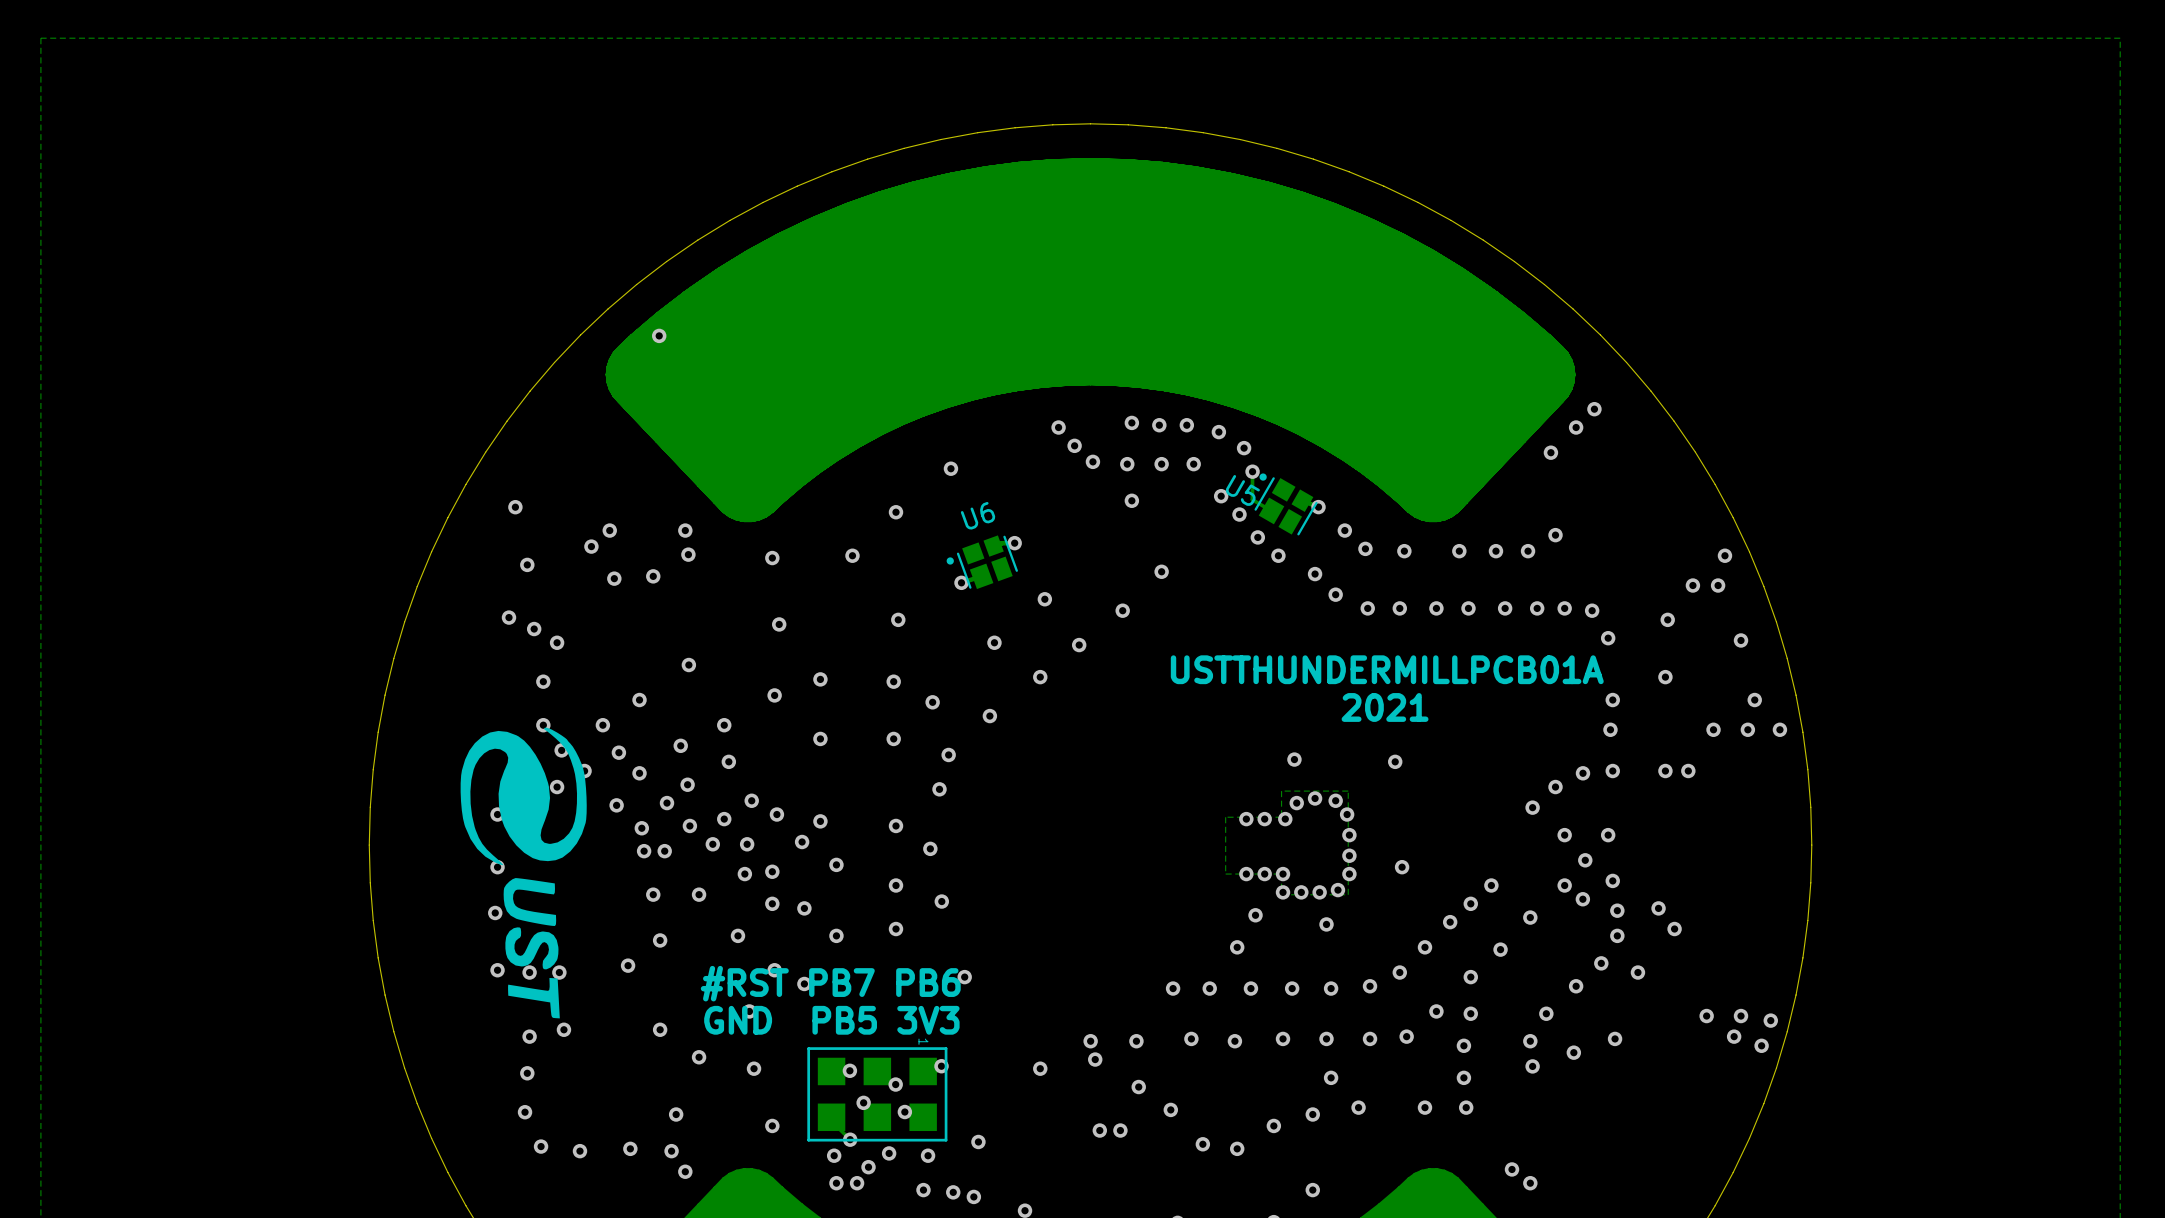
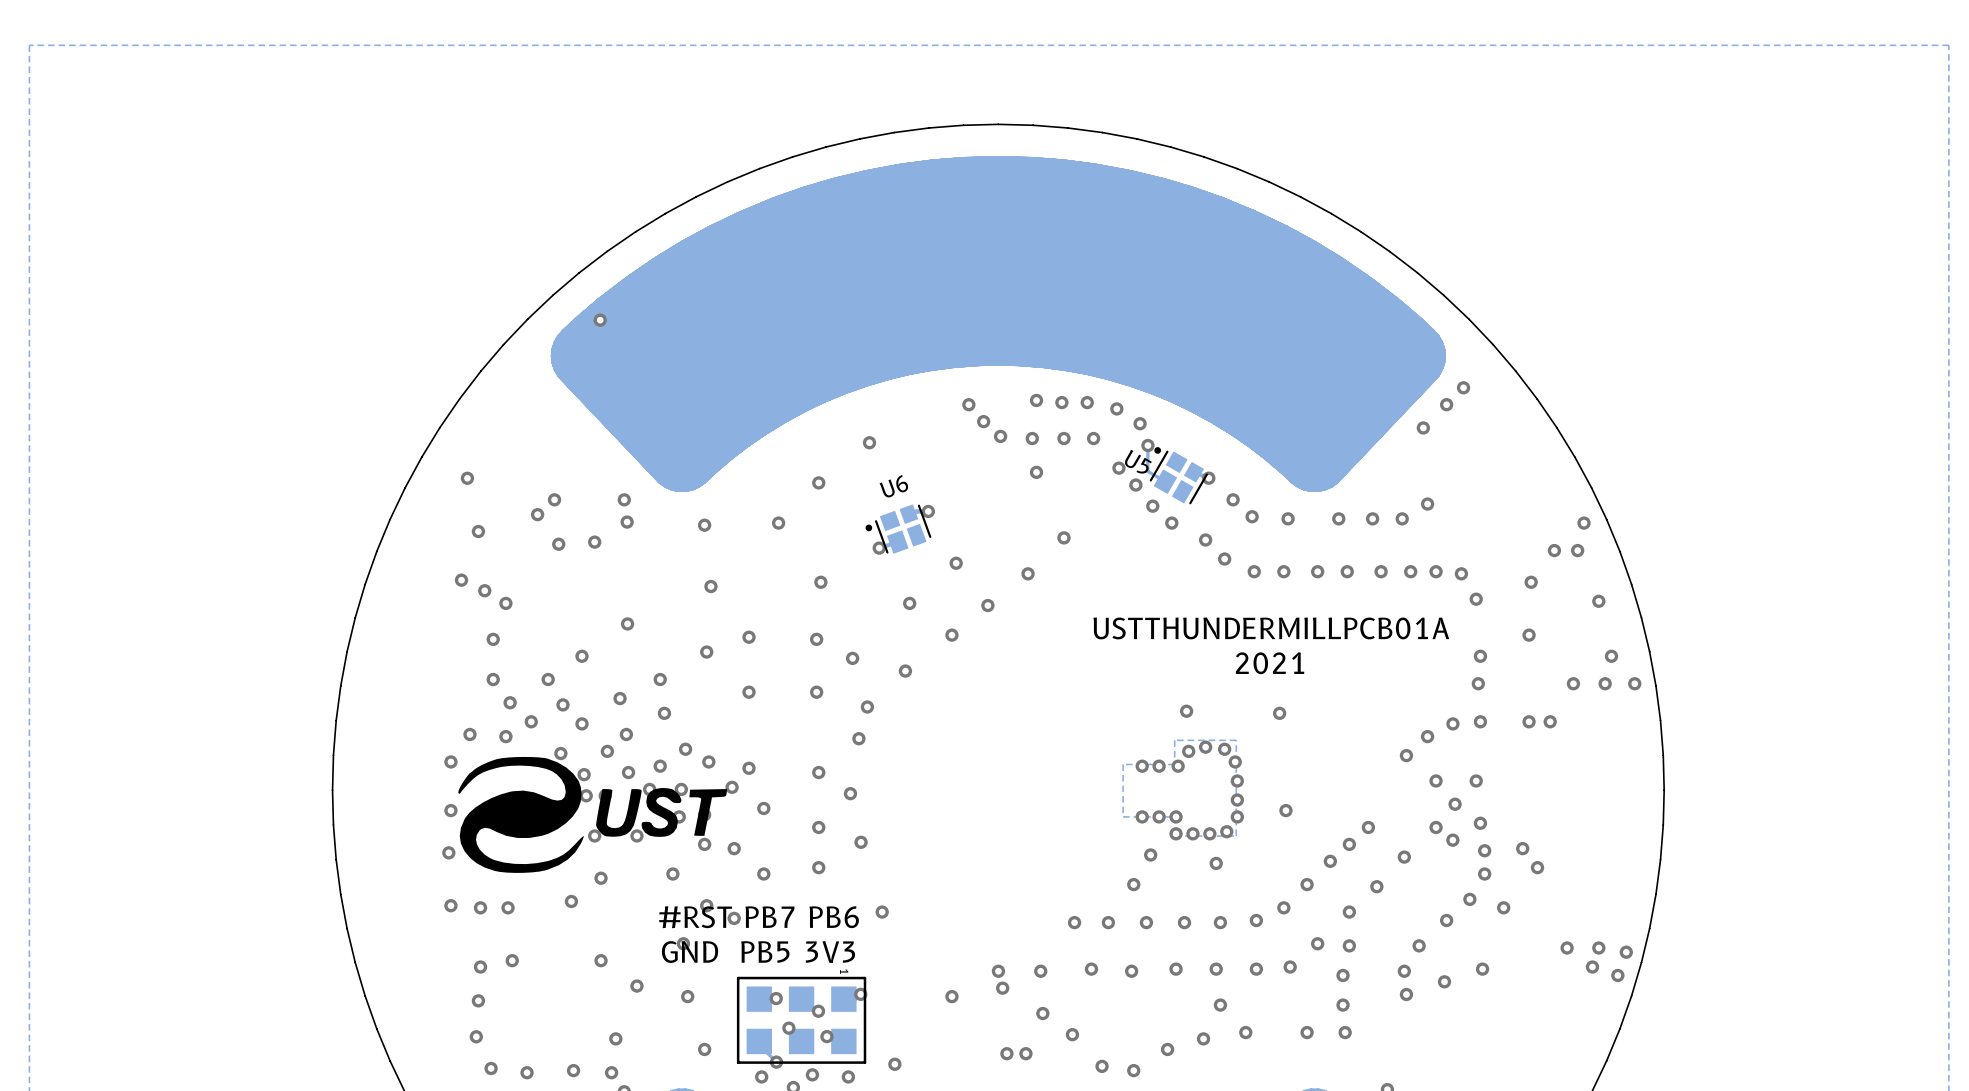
drawing: [460, 727, 587, 1019] -> none
drawing: none -> [458, 756, 728, 873]

